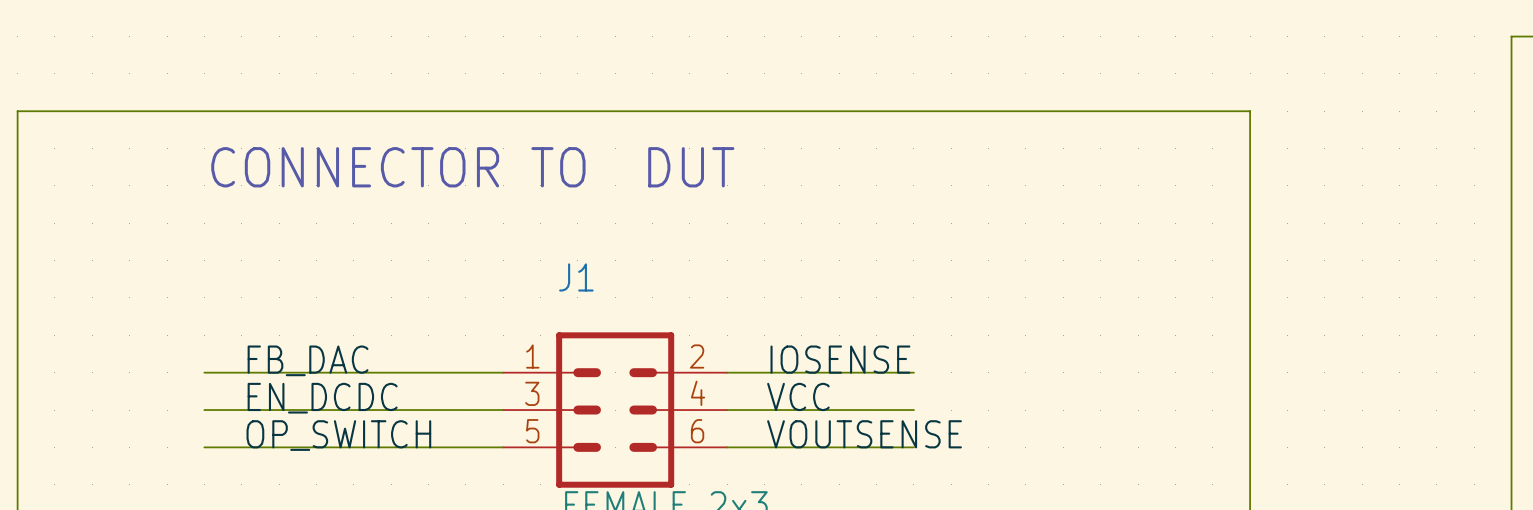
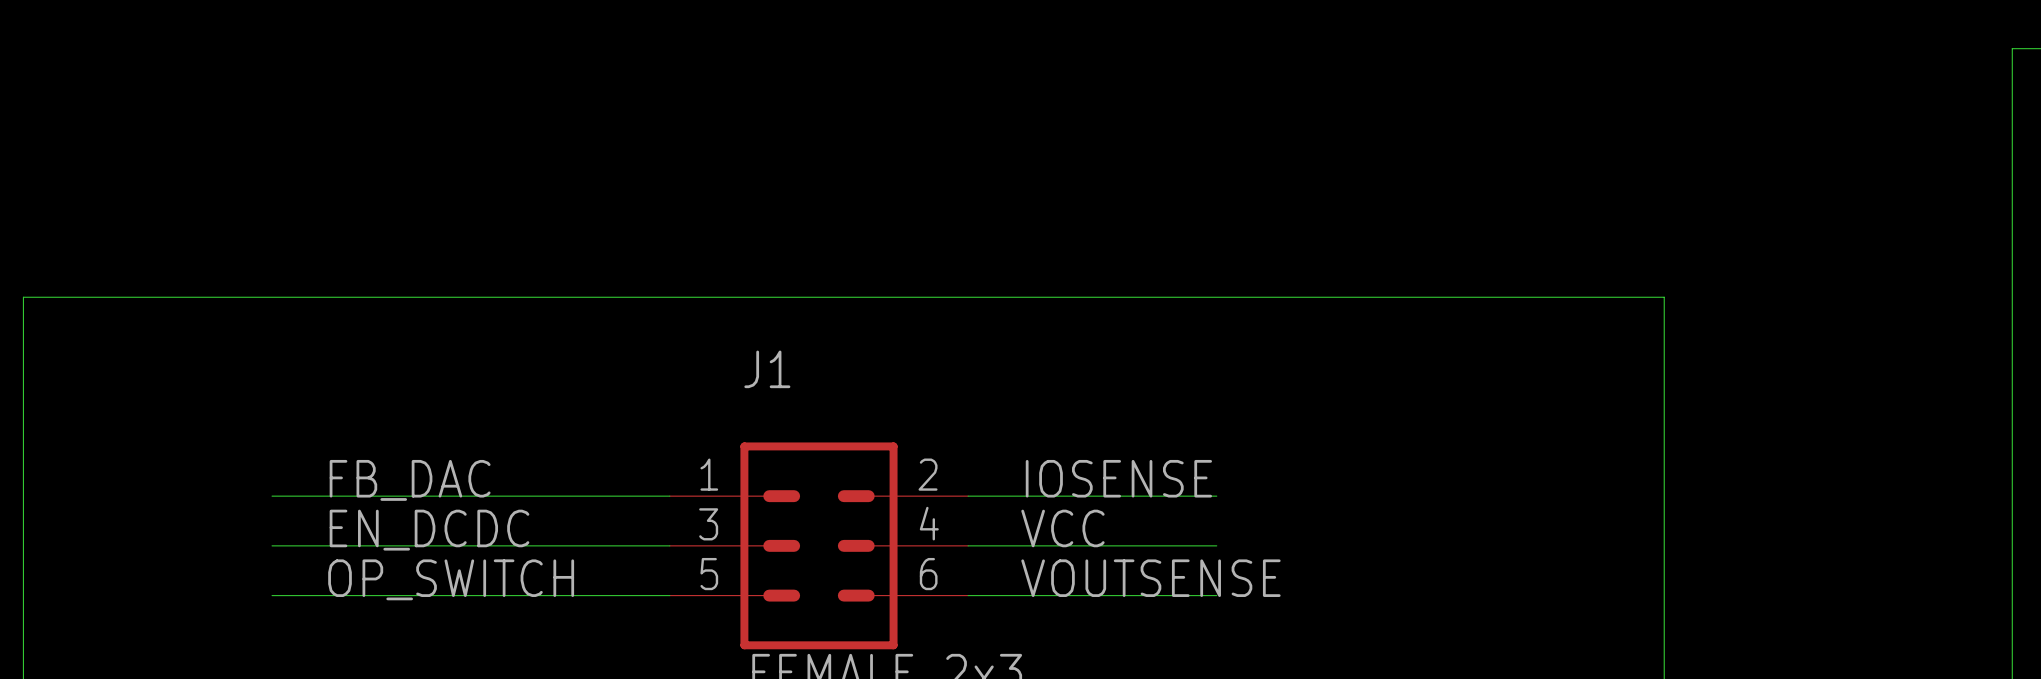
text: CONNECTOR TO DUT (472, 167) -> none
wire: (17, 223) (17, 111) (1250, 111) (1250, 223) -> (23, 297) (1664, 297)

